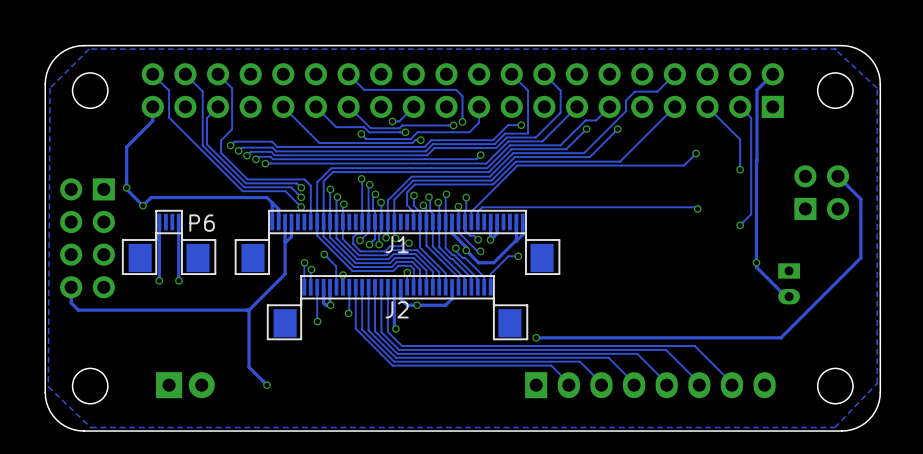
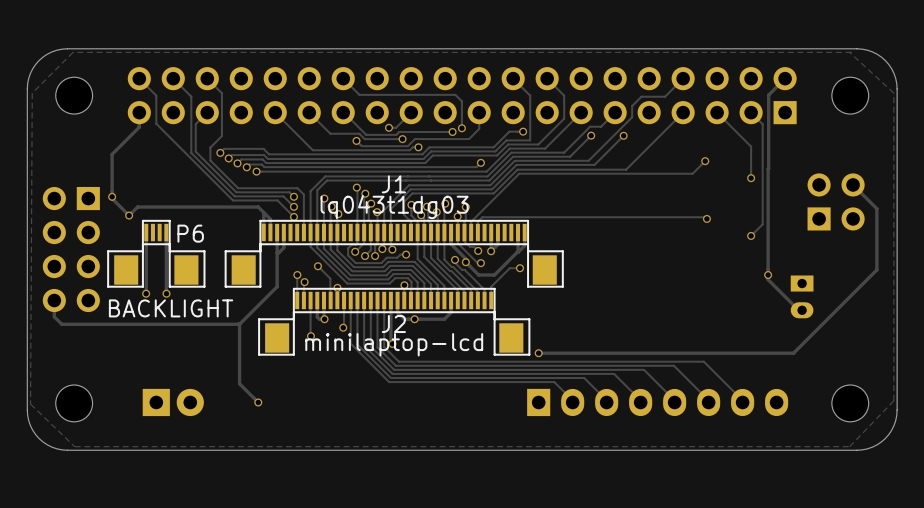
J1 value: none -> lq043t1dg03 (394, 207)
J1 name position: J1 (397, 244) -> J1 (393, 184)
P6 value: none -> BACKLIGHT (171, 308)
J2 value: none -> minilaptop-lcd (394, 344)

